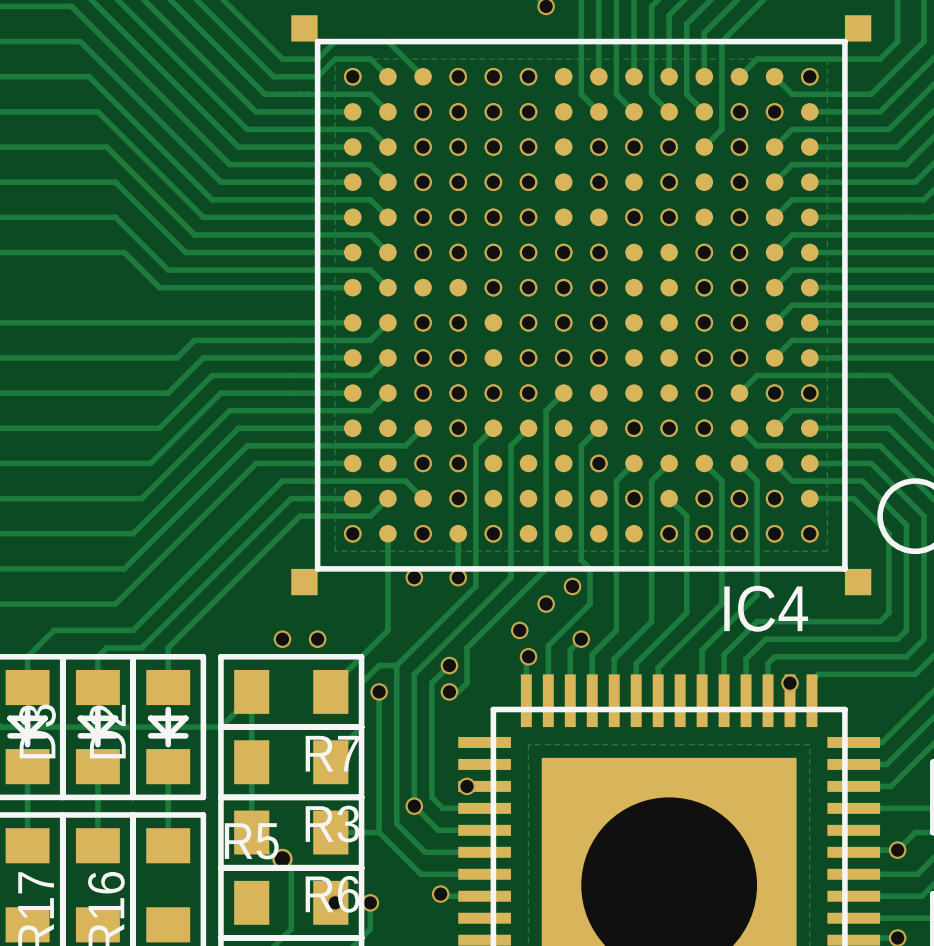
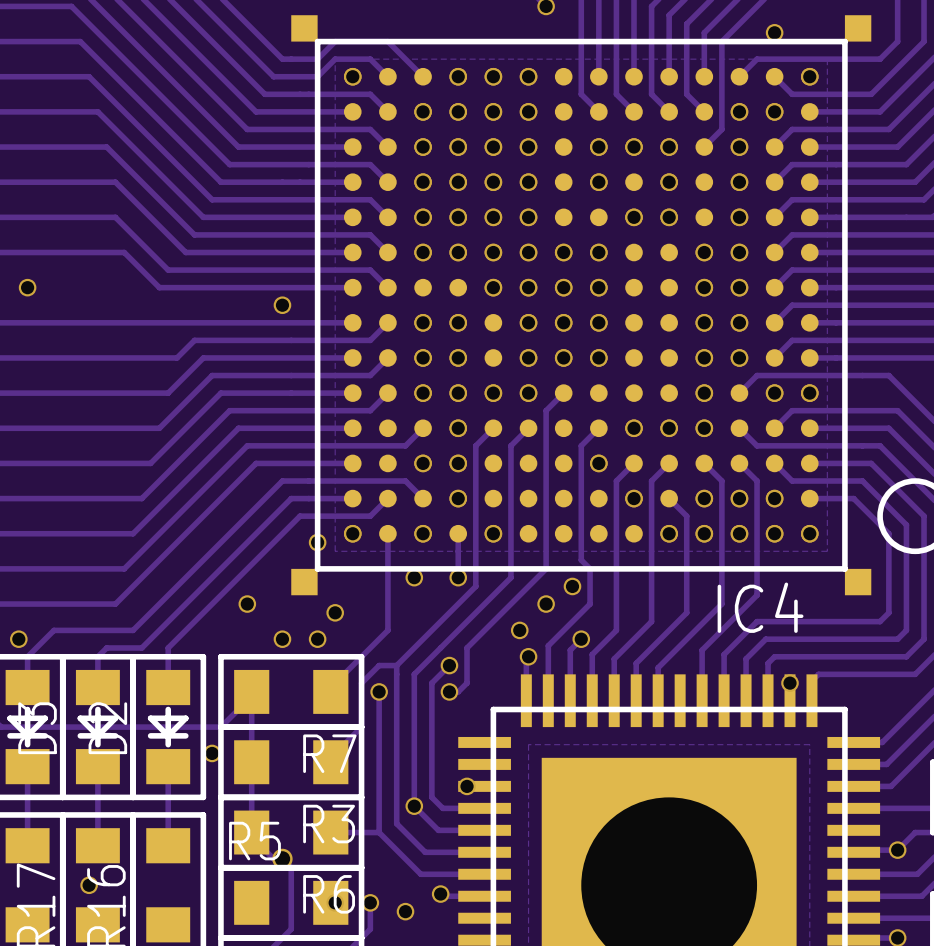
via: none -> (774, 32)
via: none -> (27, 287)
via: none -> (282, 305)
via: none -> (317, 542)
via: none -> (247, 604)
via: none -> (335, 612)
via: none -> (18, 639)
via: none -> (212, 753)
via: none -> (89, 885)
via: none -> (405, 911)

